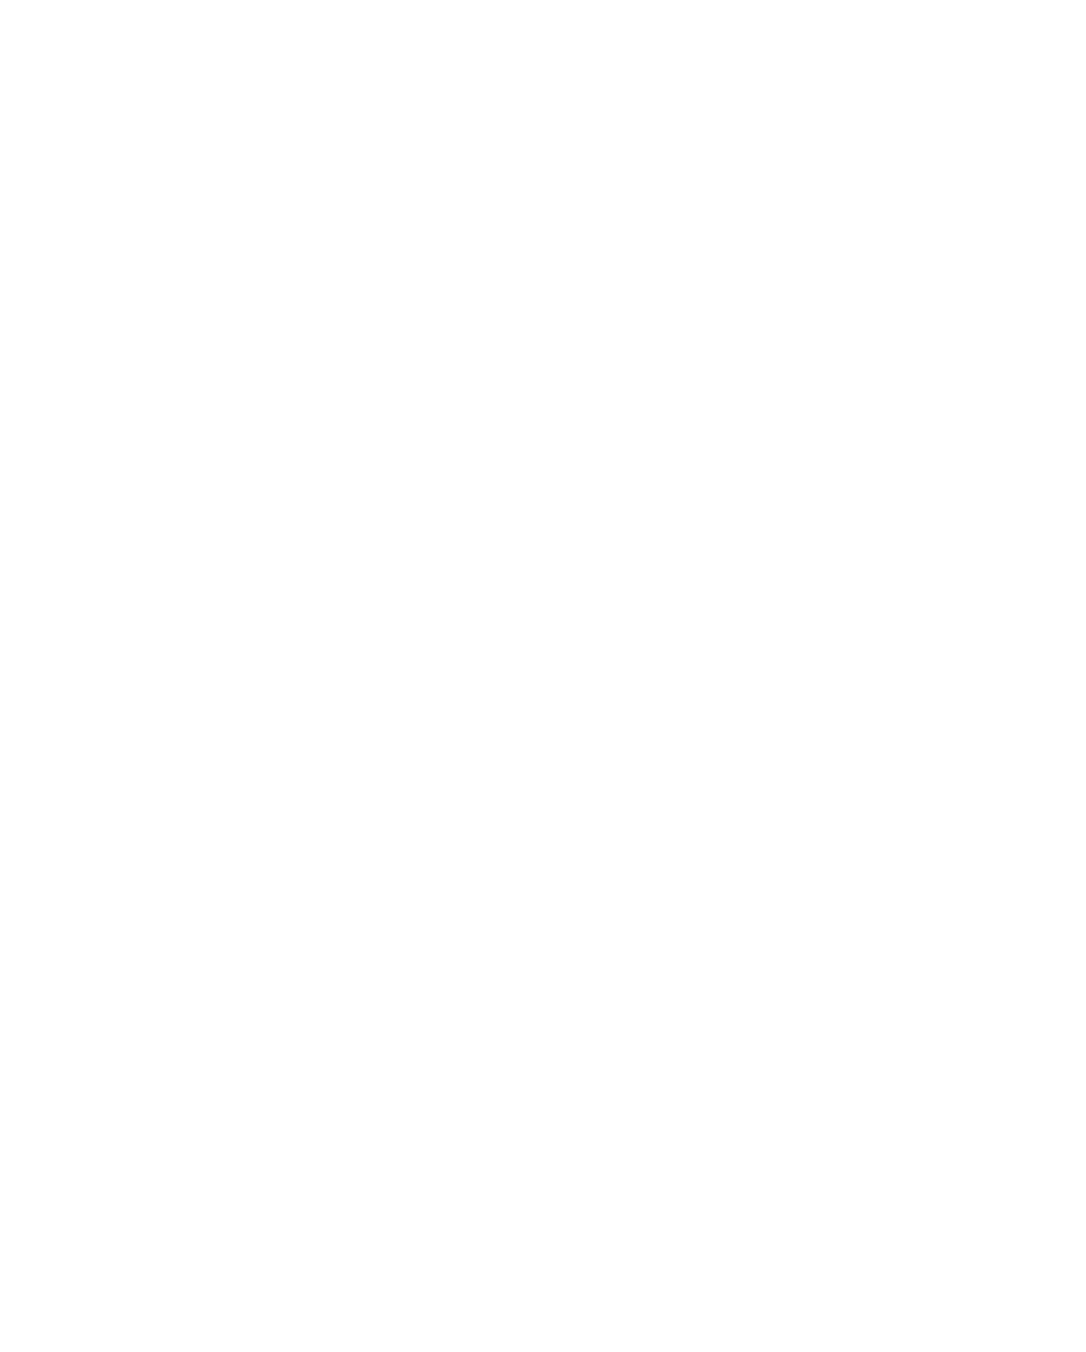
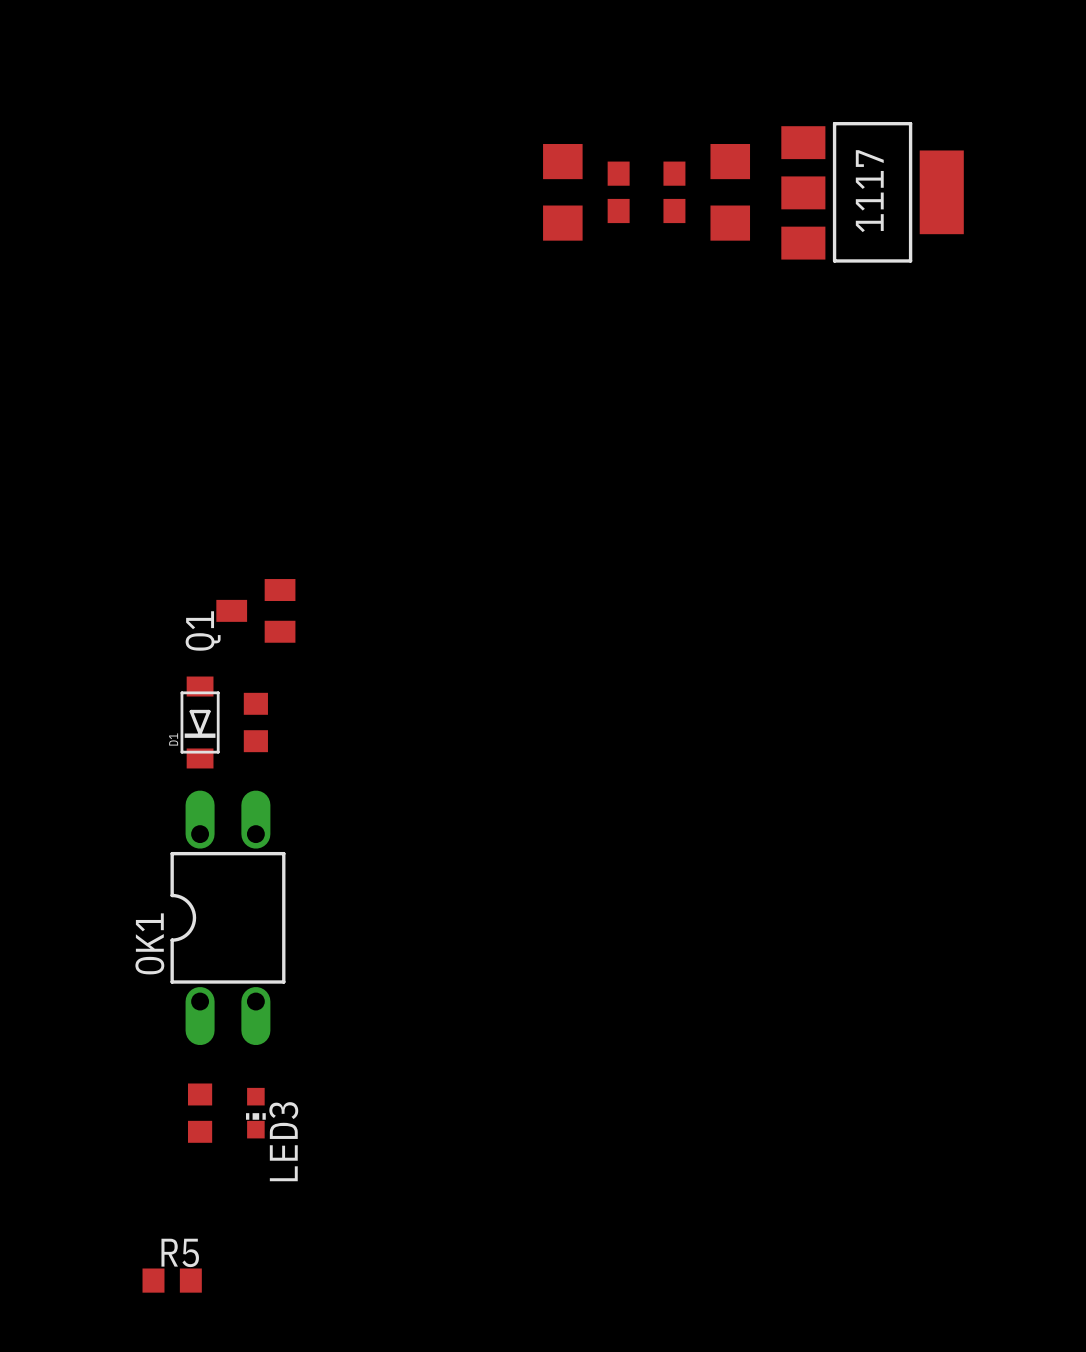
part: none -> (562, 192)
part: none -> (618, 192)
part: none -> (674, 192)
part: none -> (730, 192)
part: none -> 1117 (872, 192)
Q1: none -> (255, 610)
D1: none -> (200, 722)
part: none -> (255, 722)
OK1: none -> (227, 917)
part: none -> (200, 1113)
LED3: none -> (255, 1113)
R5: none -> (172, 1280)

